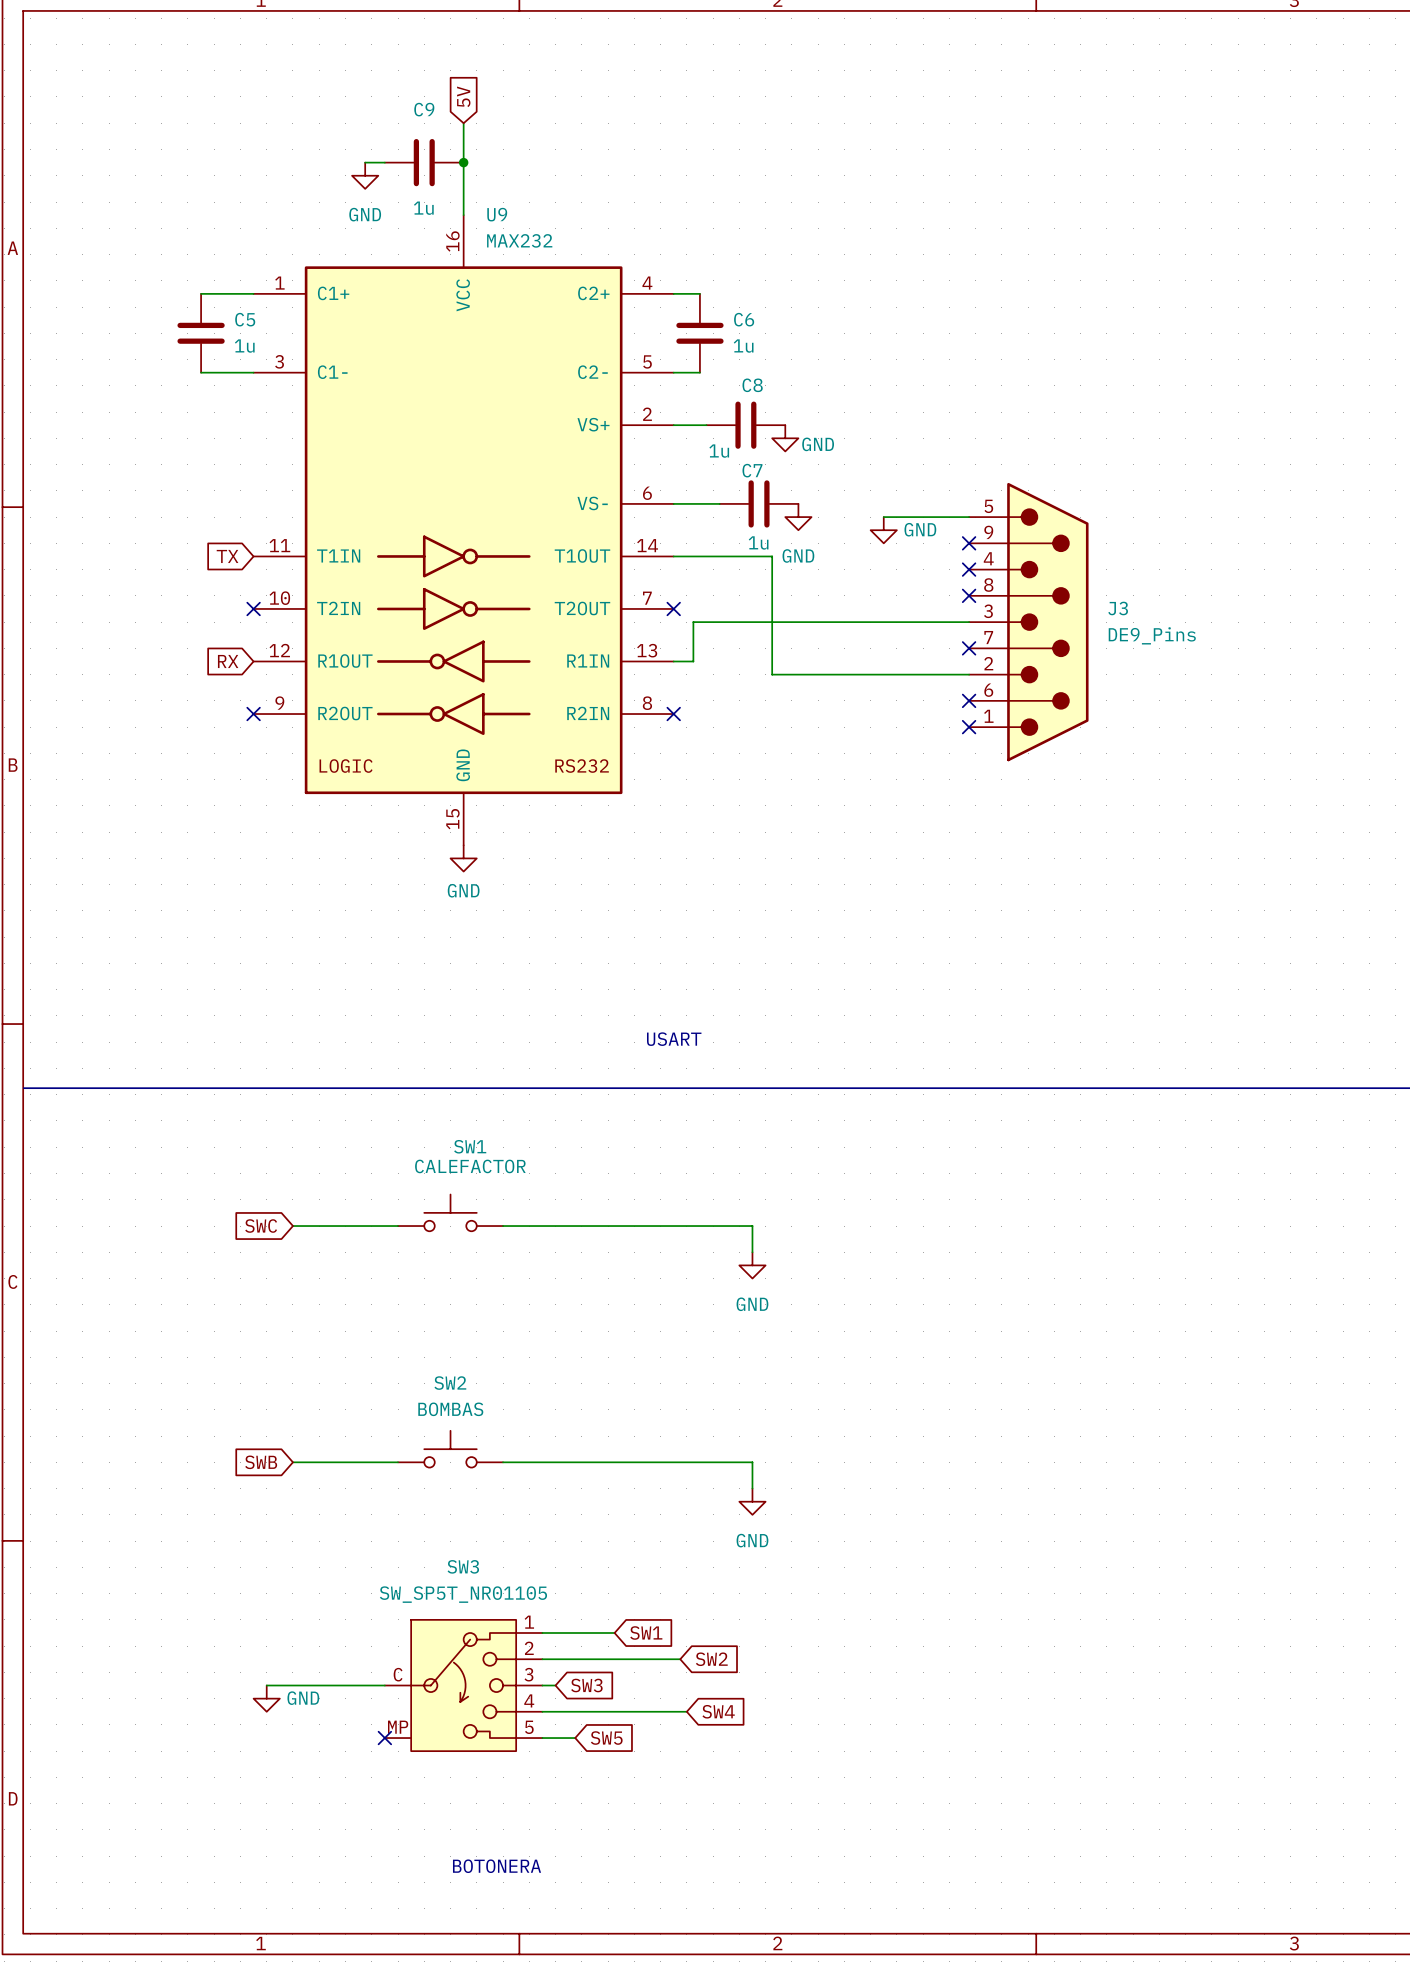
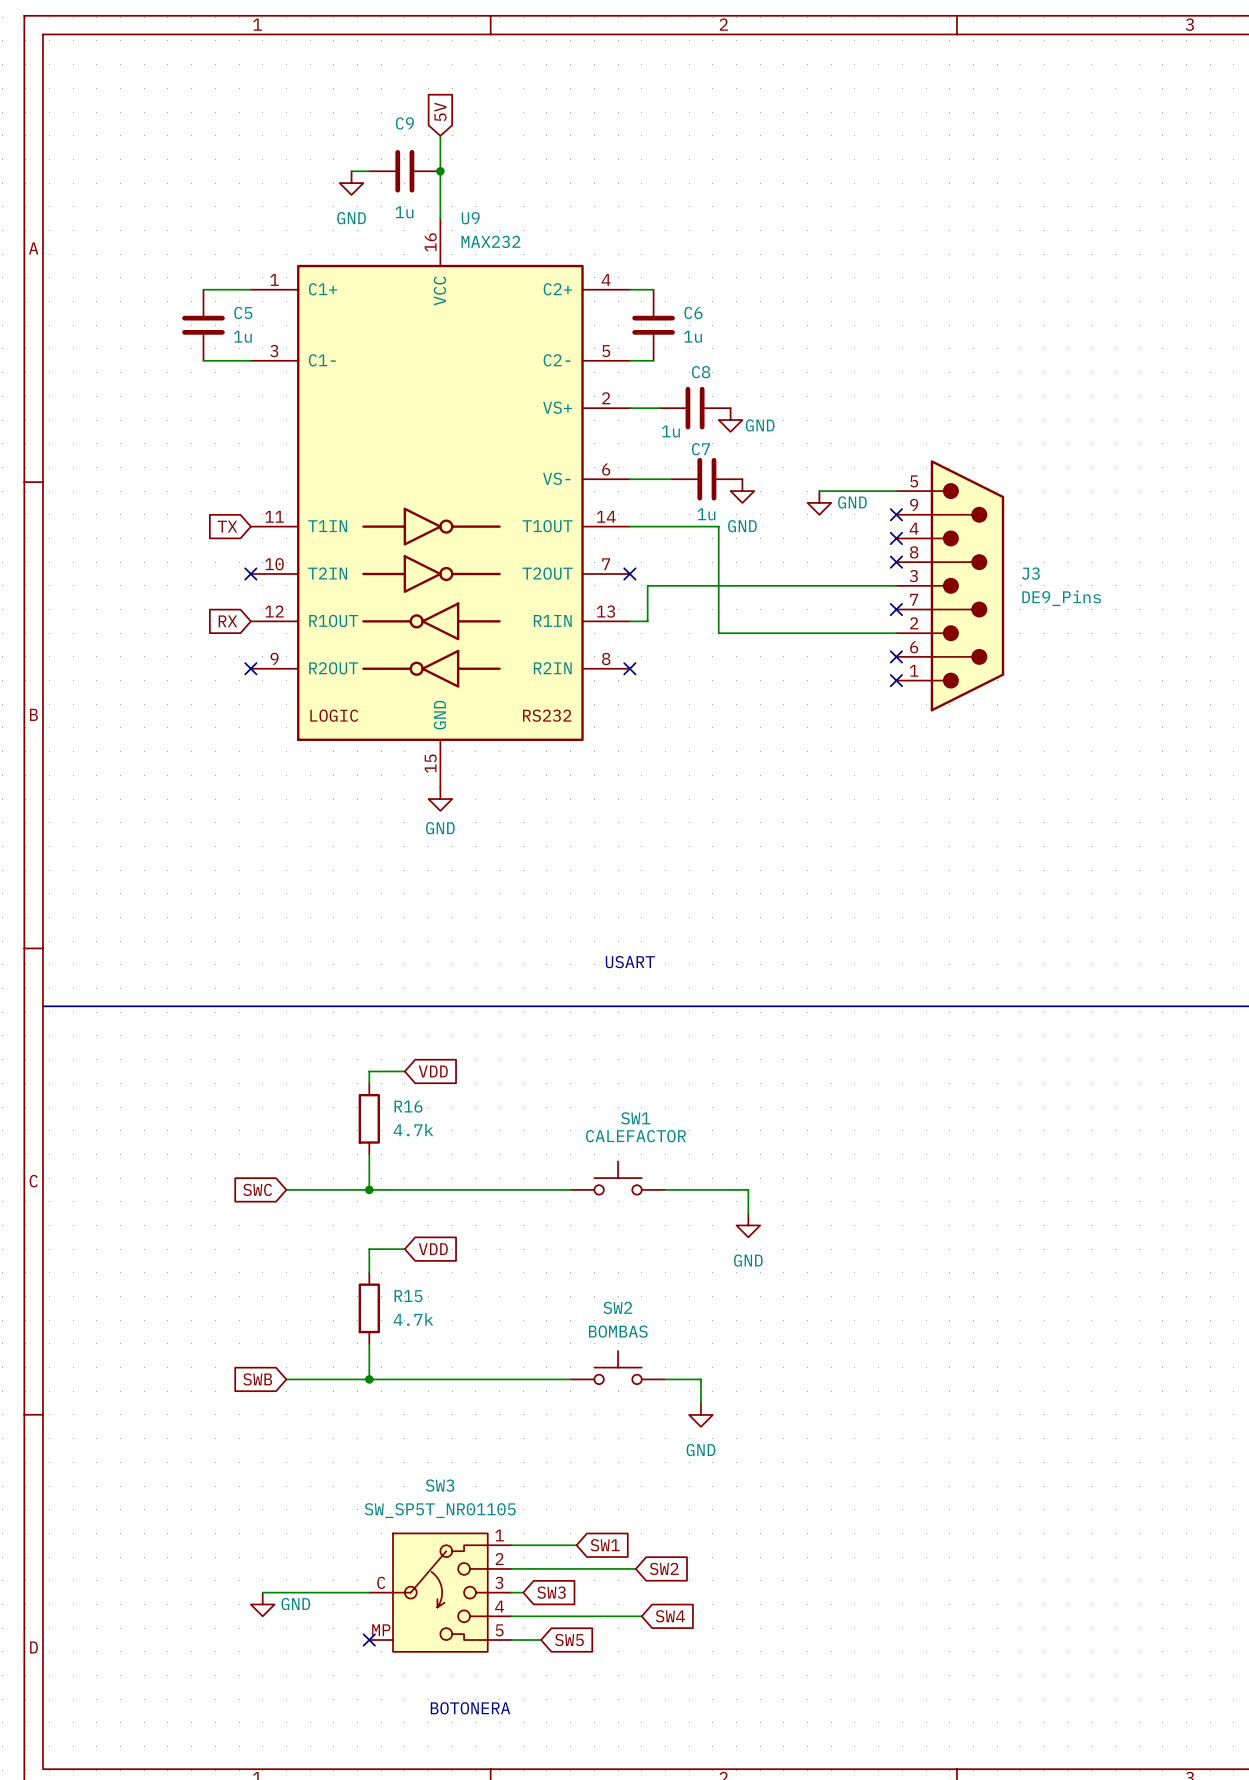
wire: none -> (404, 1071) (369, 1071) (369, 1083)
global label: none -> VDD (433, 1071)
R16: none -> 4.7k (369, 1118)
SW1 position: (450, 1212) -> (618, 1178)
global label position: SWC (261, 1226) -> SWC (257, 1189)
wire: (292, 1226) (398, 1226) -> none
wire: (503, 1226) (752, 1226) (752, 1252) -> none
wire: none -> (369, 1154) (369, 1189)
power symbol position: GND (752, 1265) -> GND (748, 1225)
wire: none -> (286, 1189) (570, 1189)
junction: none -> (369, 1189)
wire: none -> (665, 1189) (748, 1189) (748, 1213)
wire: none -> (404, 1249) (369, 1249) (369, 1272)
global label: none -> VDD (433, 1249)
R15: none -> 4.7k (369, 1308)
SW2 position: (450, 1449) -> (618, 1367)
global label position: SWB (261, 1462) -> SWB (257, 1379)
wire: (292, 1462) (398, 1462) -> none
wire: none -> (369, 1343) (369, 1379)
wire: (503, 1462) (752, 1462) (752, 1488) -> none
wire: none -> (286, 1379) (570, 1379)
junction: none -> (369, 1379)
wire: none -> (665, 1379) (700, 1379) (700, 1403)
power symbol position: GND (752, 1501) -> GND (700, 1414)
wire: (542, 1632) (614, 1632) -> none
global label position: SW1 (646, 1632) -> SW1 (605, 1545)
wire: (542, 1659) (680, 1659) -> none
global label position: SW2 (711, 1659) -> SW2 (664, 1568)
wire: (266, 1685) (384, 1685) -> (262, 1592) (369, 1592)
SW3 position: (463, 1685) -> (440, 1592)
wire: none -> (523, 1545) (576, 1545)
global label position: SW3 (586, 1685) -> SW3 (551, 1592)
power symbol position: GND (266, 1698) -> GND (262, 1604)
wire: (680, 1711) (686, 1711) -> none
global label position: SW4 (718, 1711) -> SW4 (670, 1616)
no-connect mark position: (384, 1738) -> (369, 1640)
wire: (555, 1738) (575, 1738) -> none
global label position: SW5 (606, 1738) -> SW5 (569, 1640)
wire: none -> (511, 1616) (641, 1616)
wire: none -> (511, 1640) (541, 1640)

